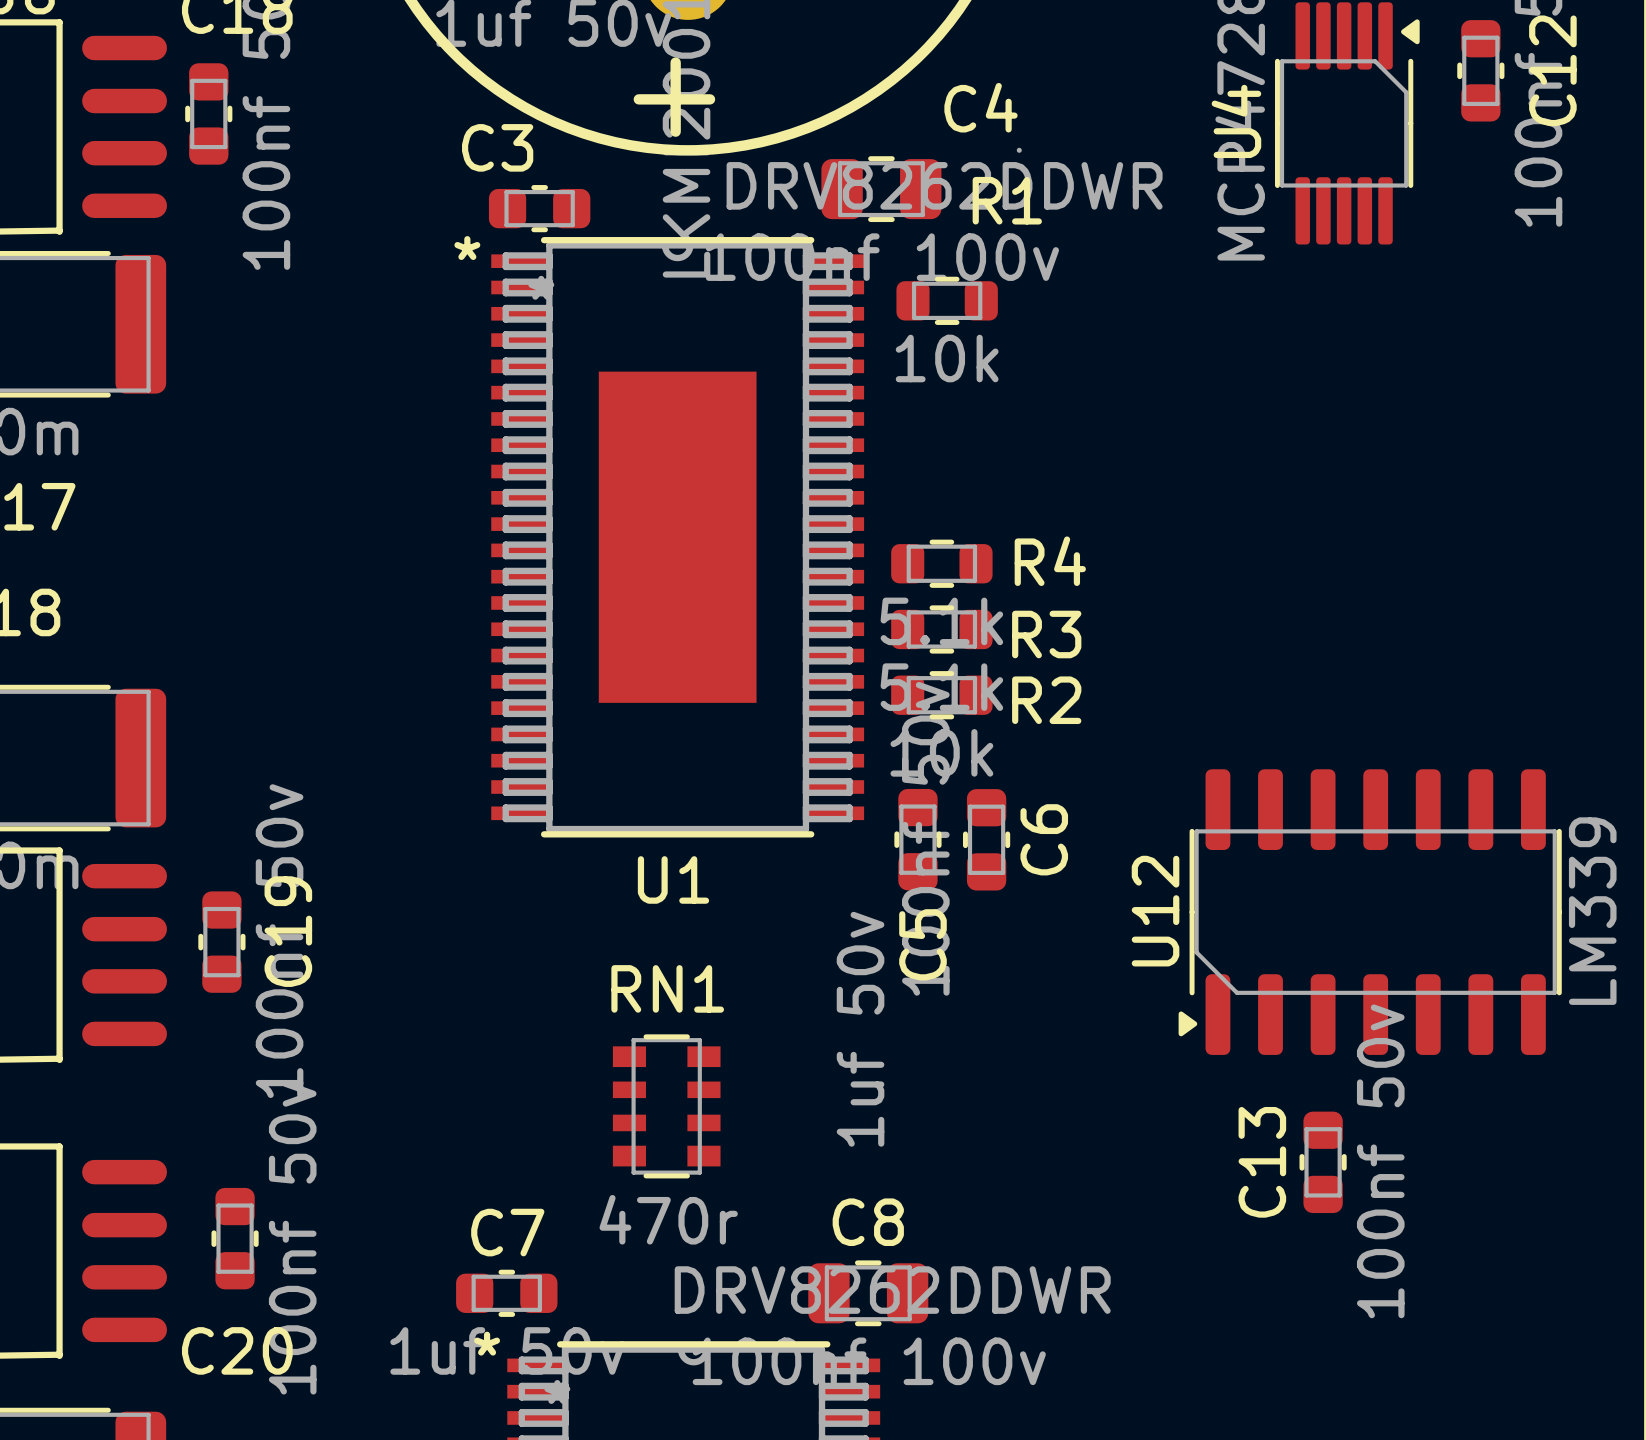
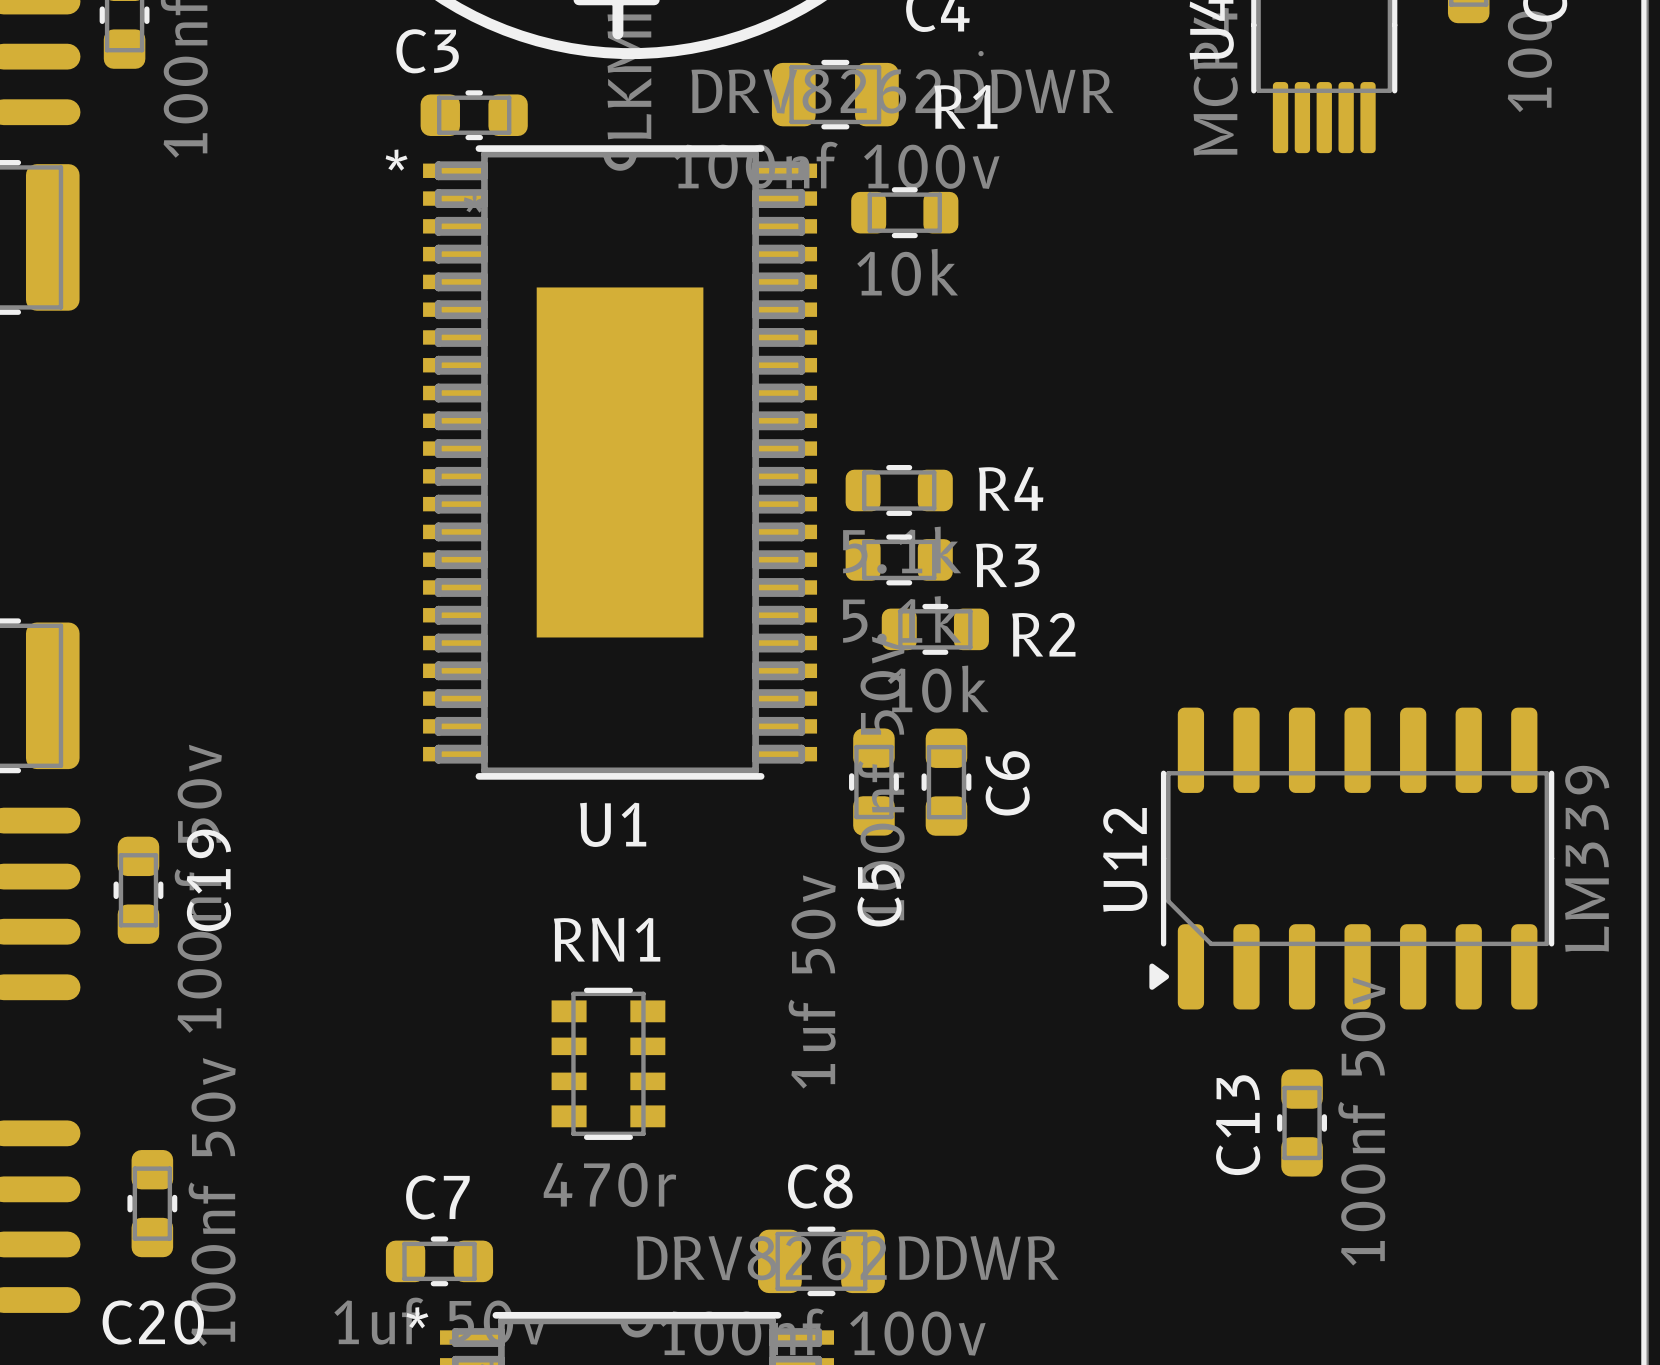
R2 position: (941, 695) -> (935, 629)

